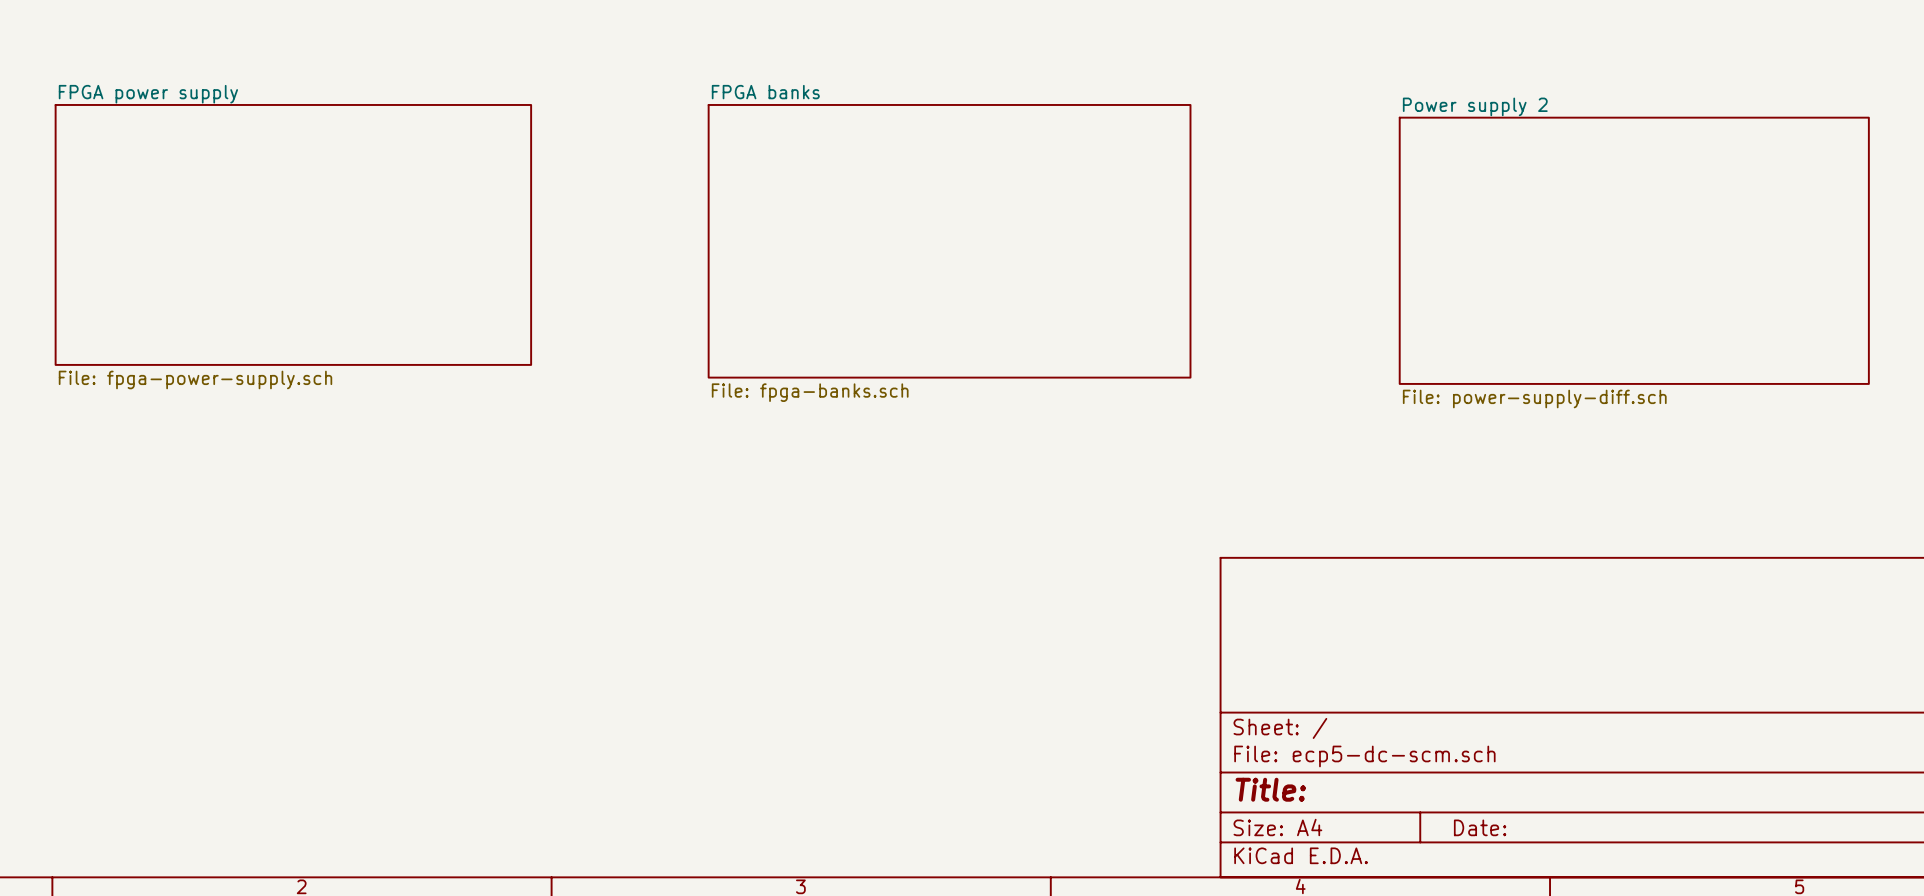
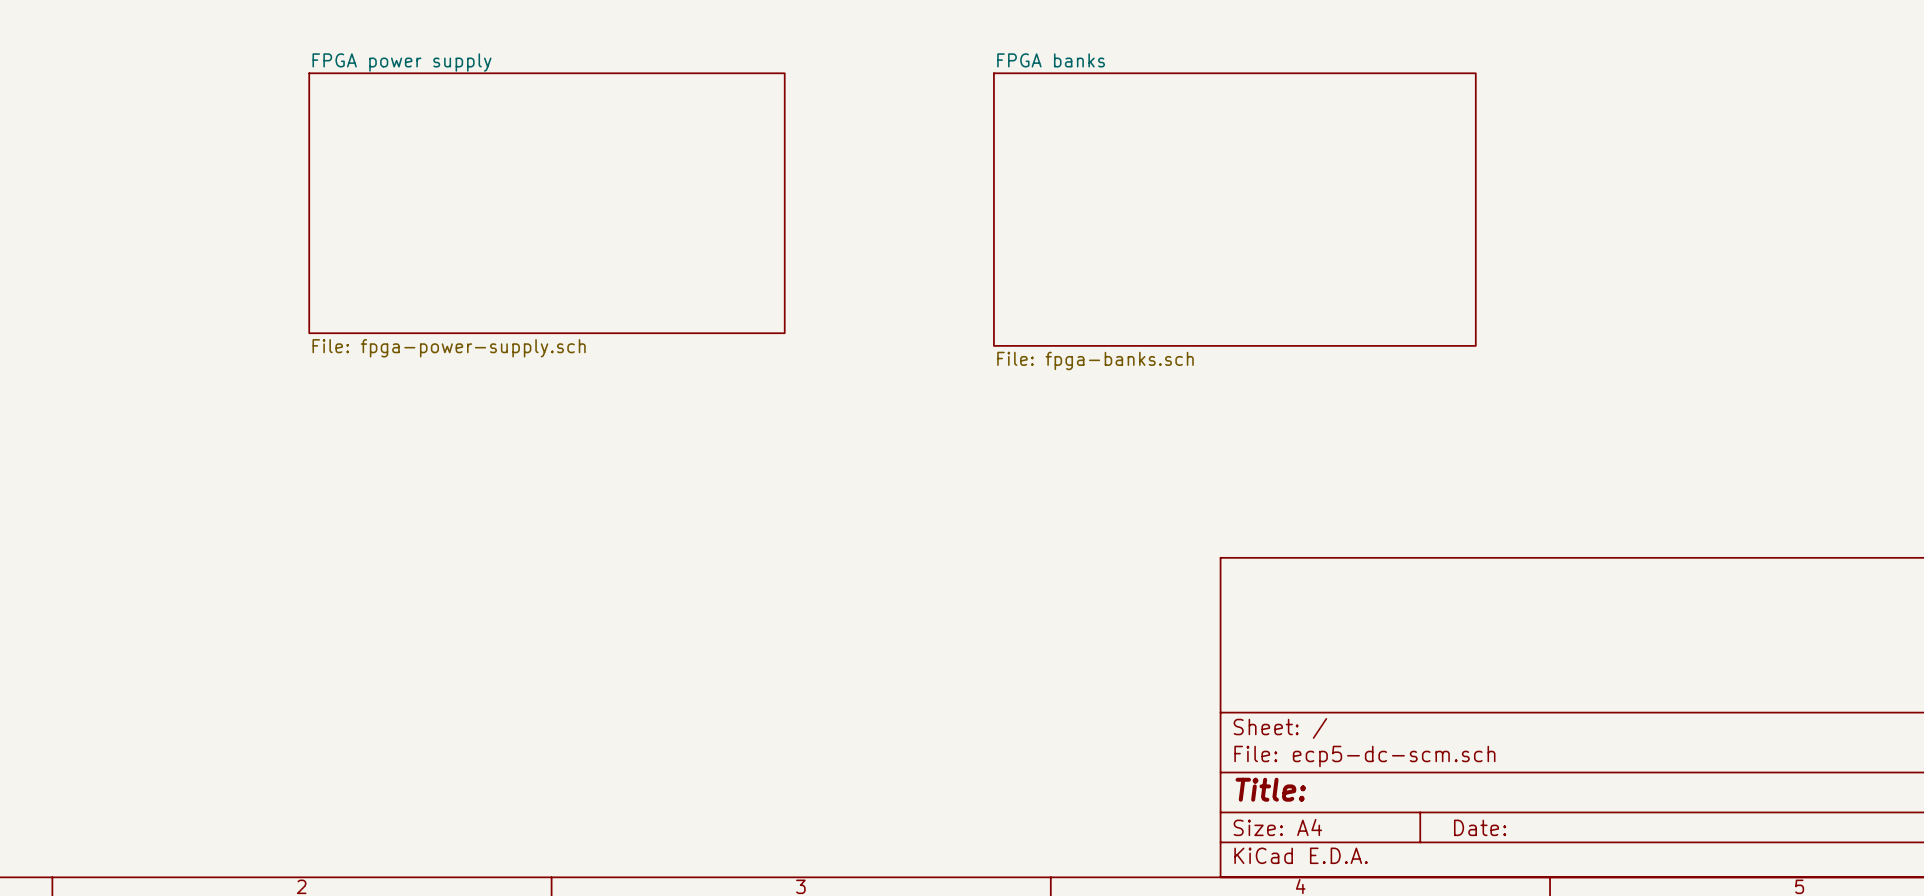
sheet FPGA power supply: none -> File: fpga-power-supply.sch (546, 203)
sheet FPGA banks: none -> File: fpga-banks.sch (1234, 209)
sheet FPGA power supply: File: fpga-power-supply.sch (293, 234) -> none
sheet FPGA banks: File: fpga-banks.sch (949, 241) -> none
sheet Power supply 2: File: power-supply-diff.sch (1634, 250) -> none

